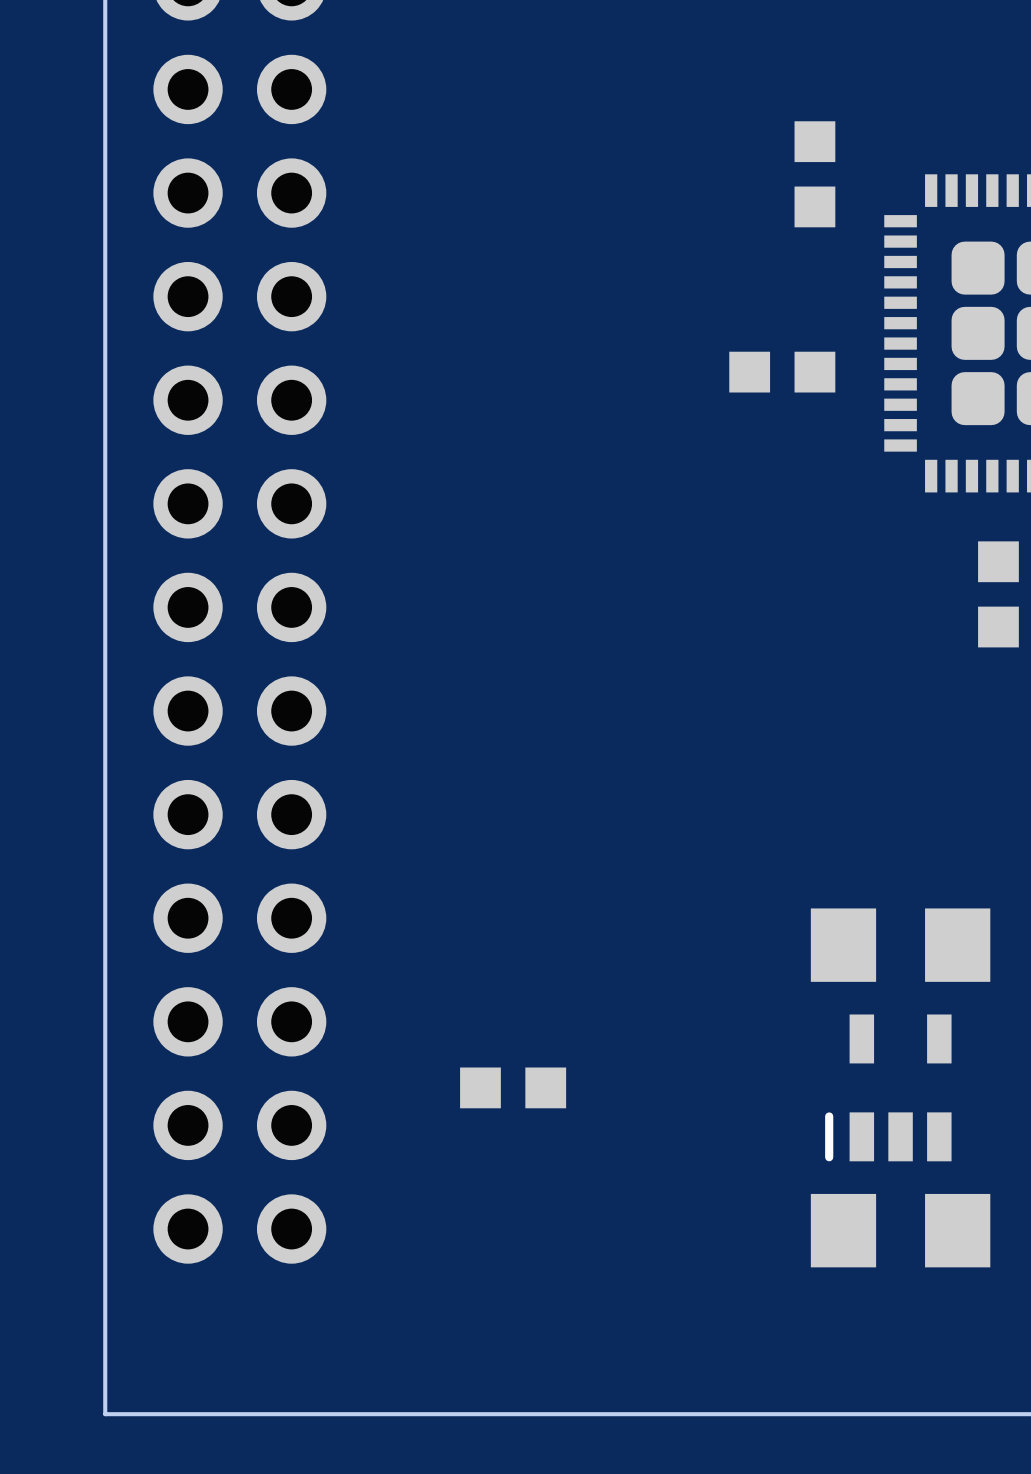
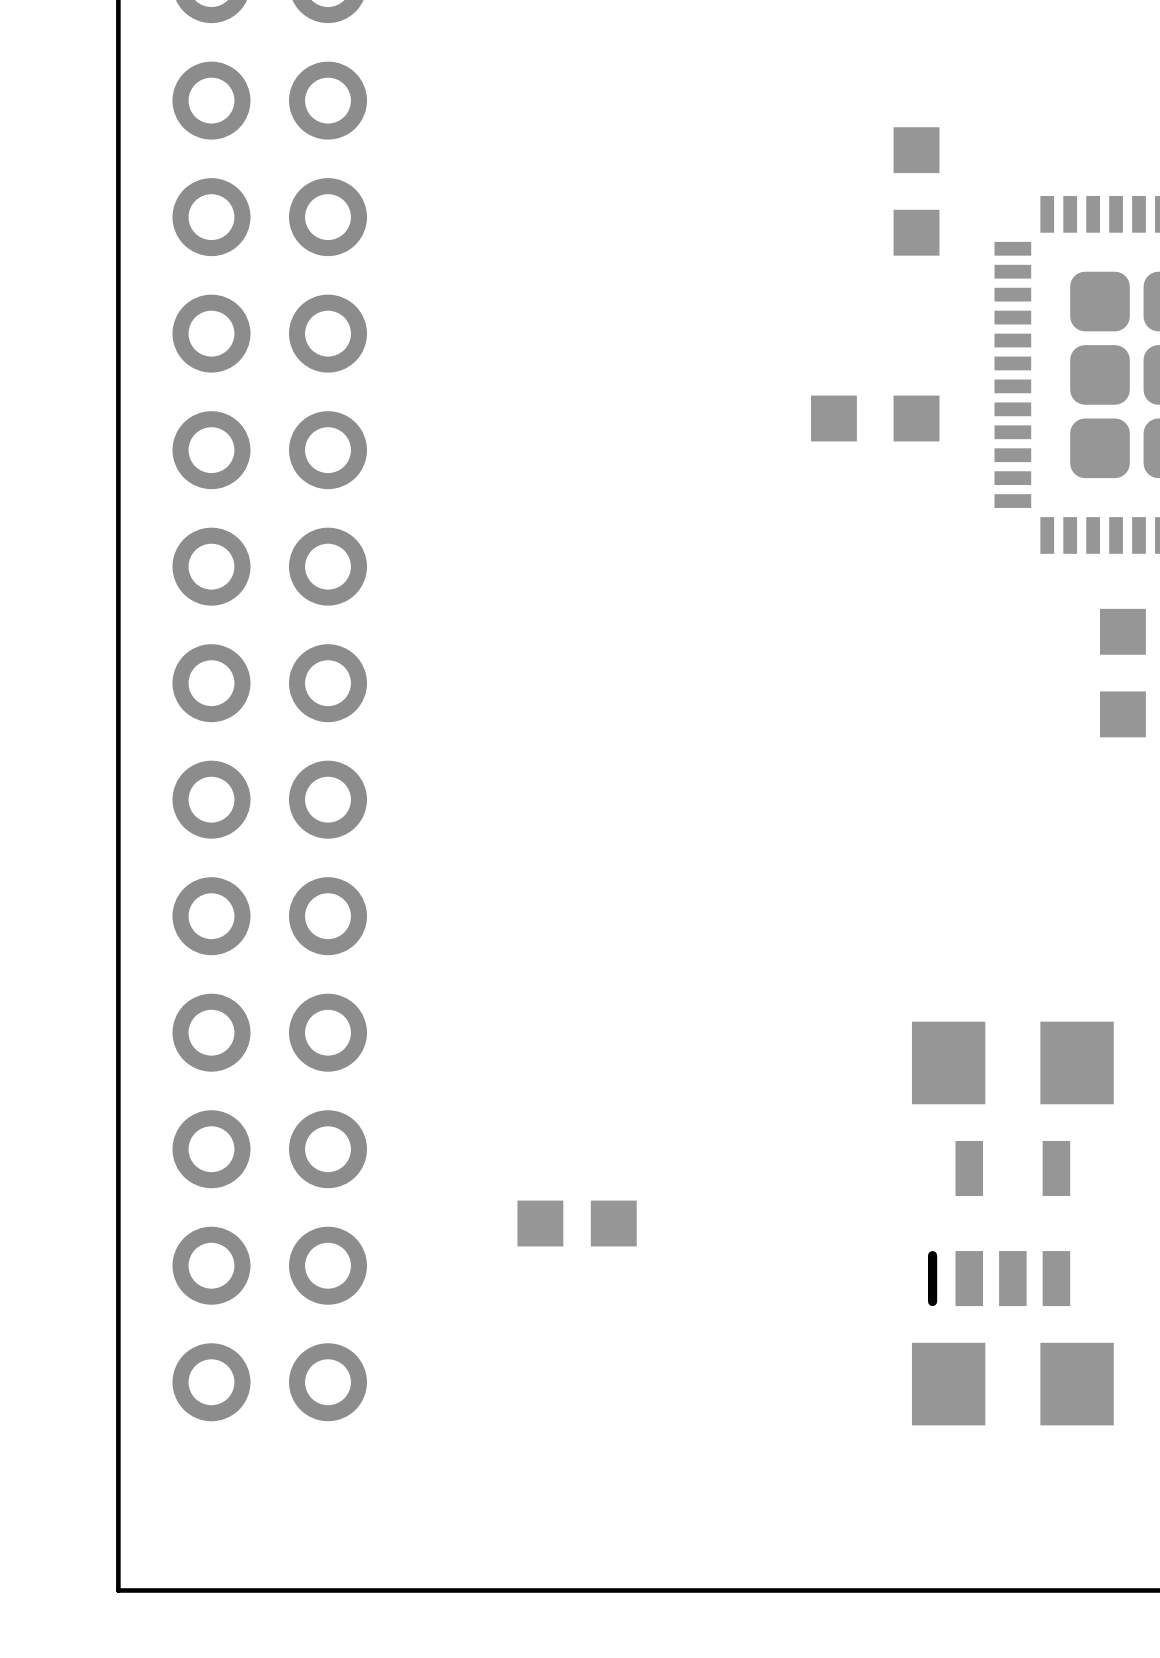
part footprint: [794, 121, 836, 228] -> [893, 127, 940, 256]
part footprint: [729, 351, 836, 393] -> [811, 395, 940, 442]
part footprint: [978, 541, 1019, 648] -> [1100, 608, 1146, 738]

